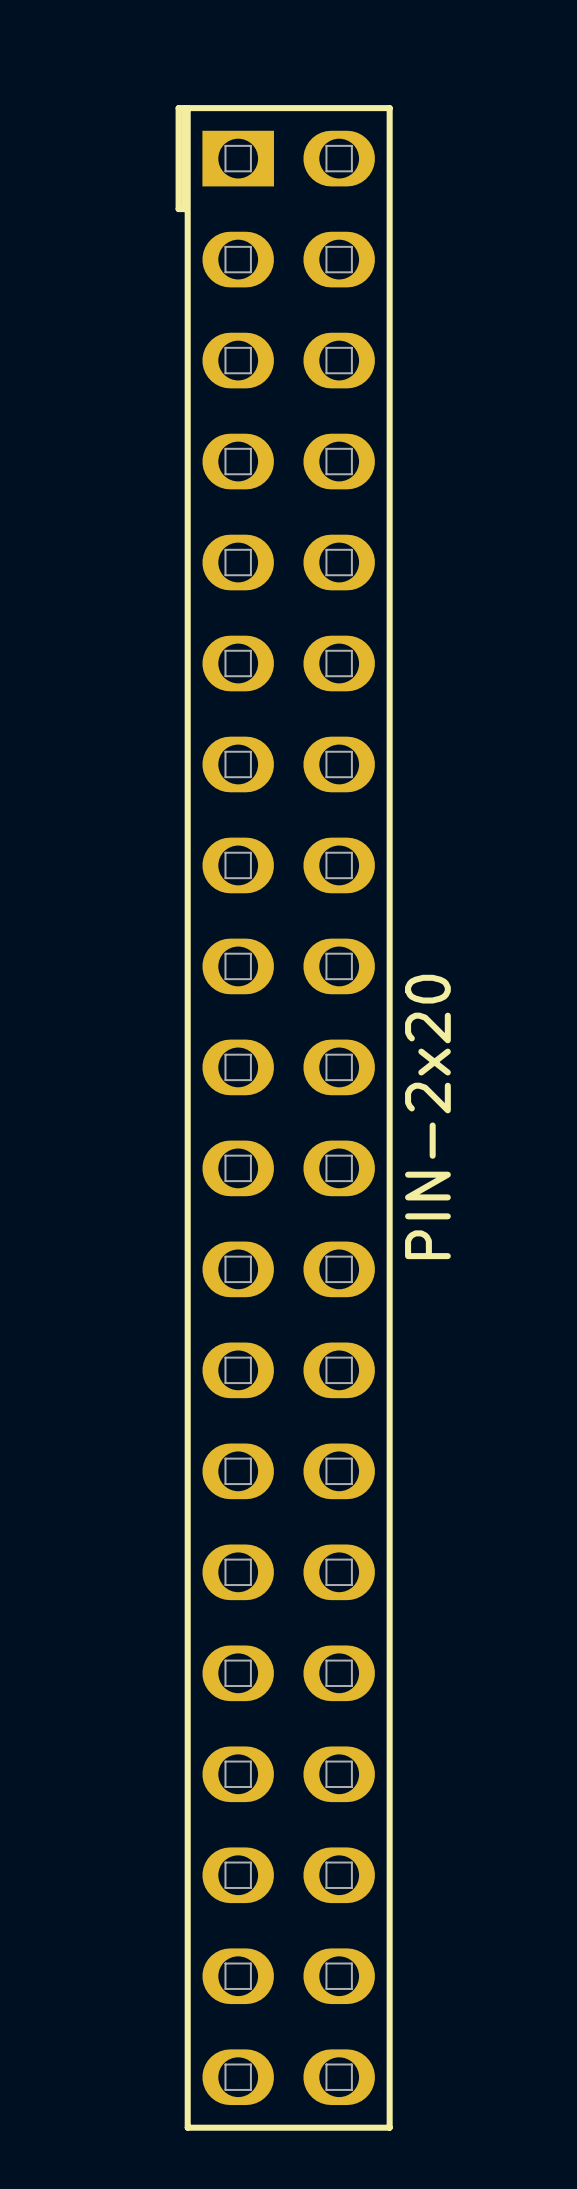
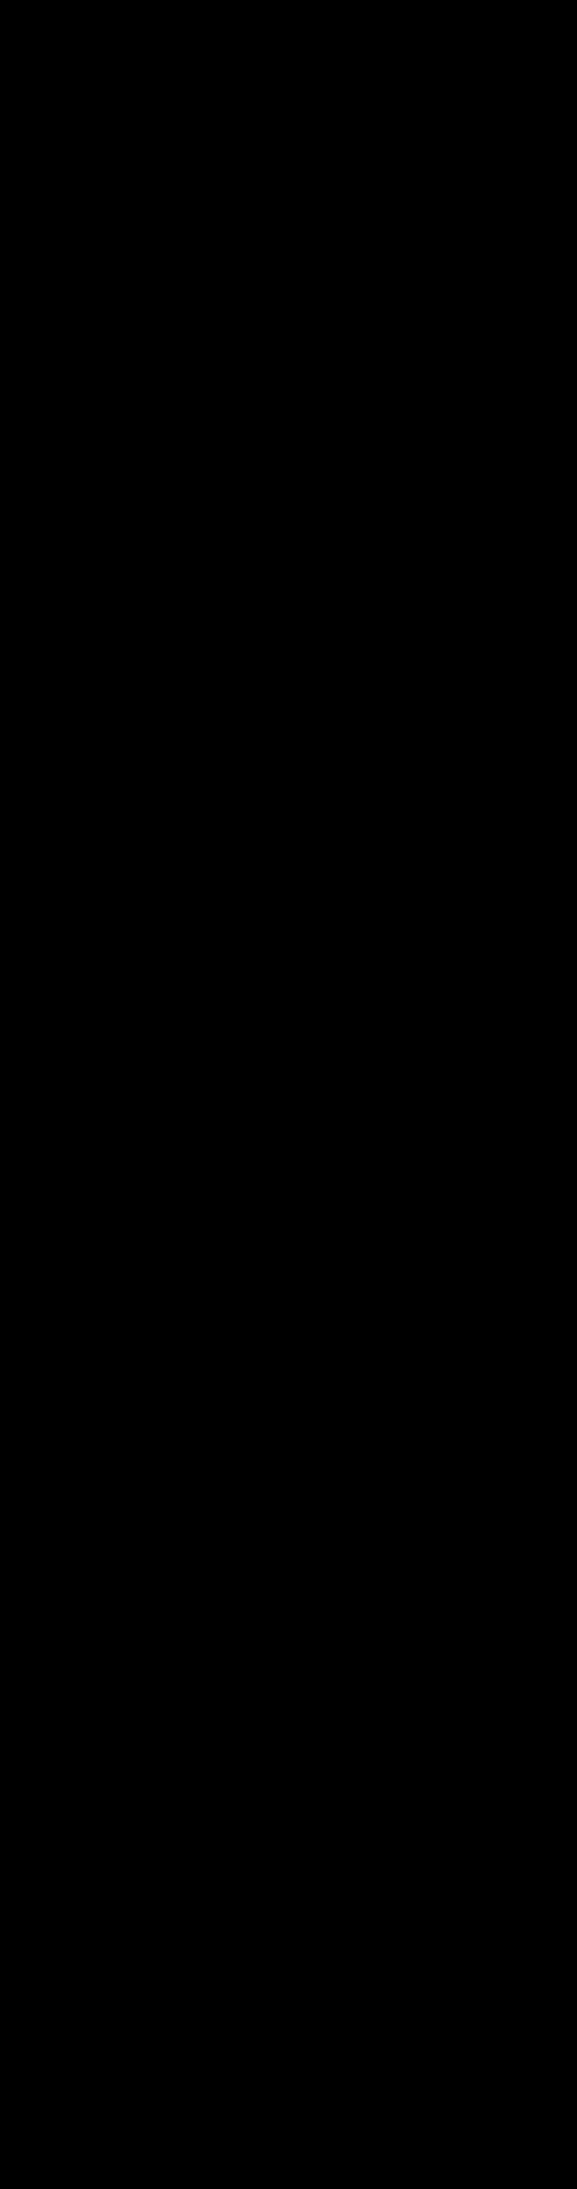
part: PIN-2x20 (284, 1117) -> none

